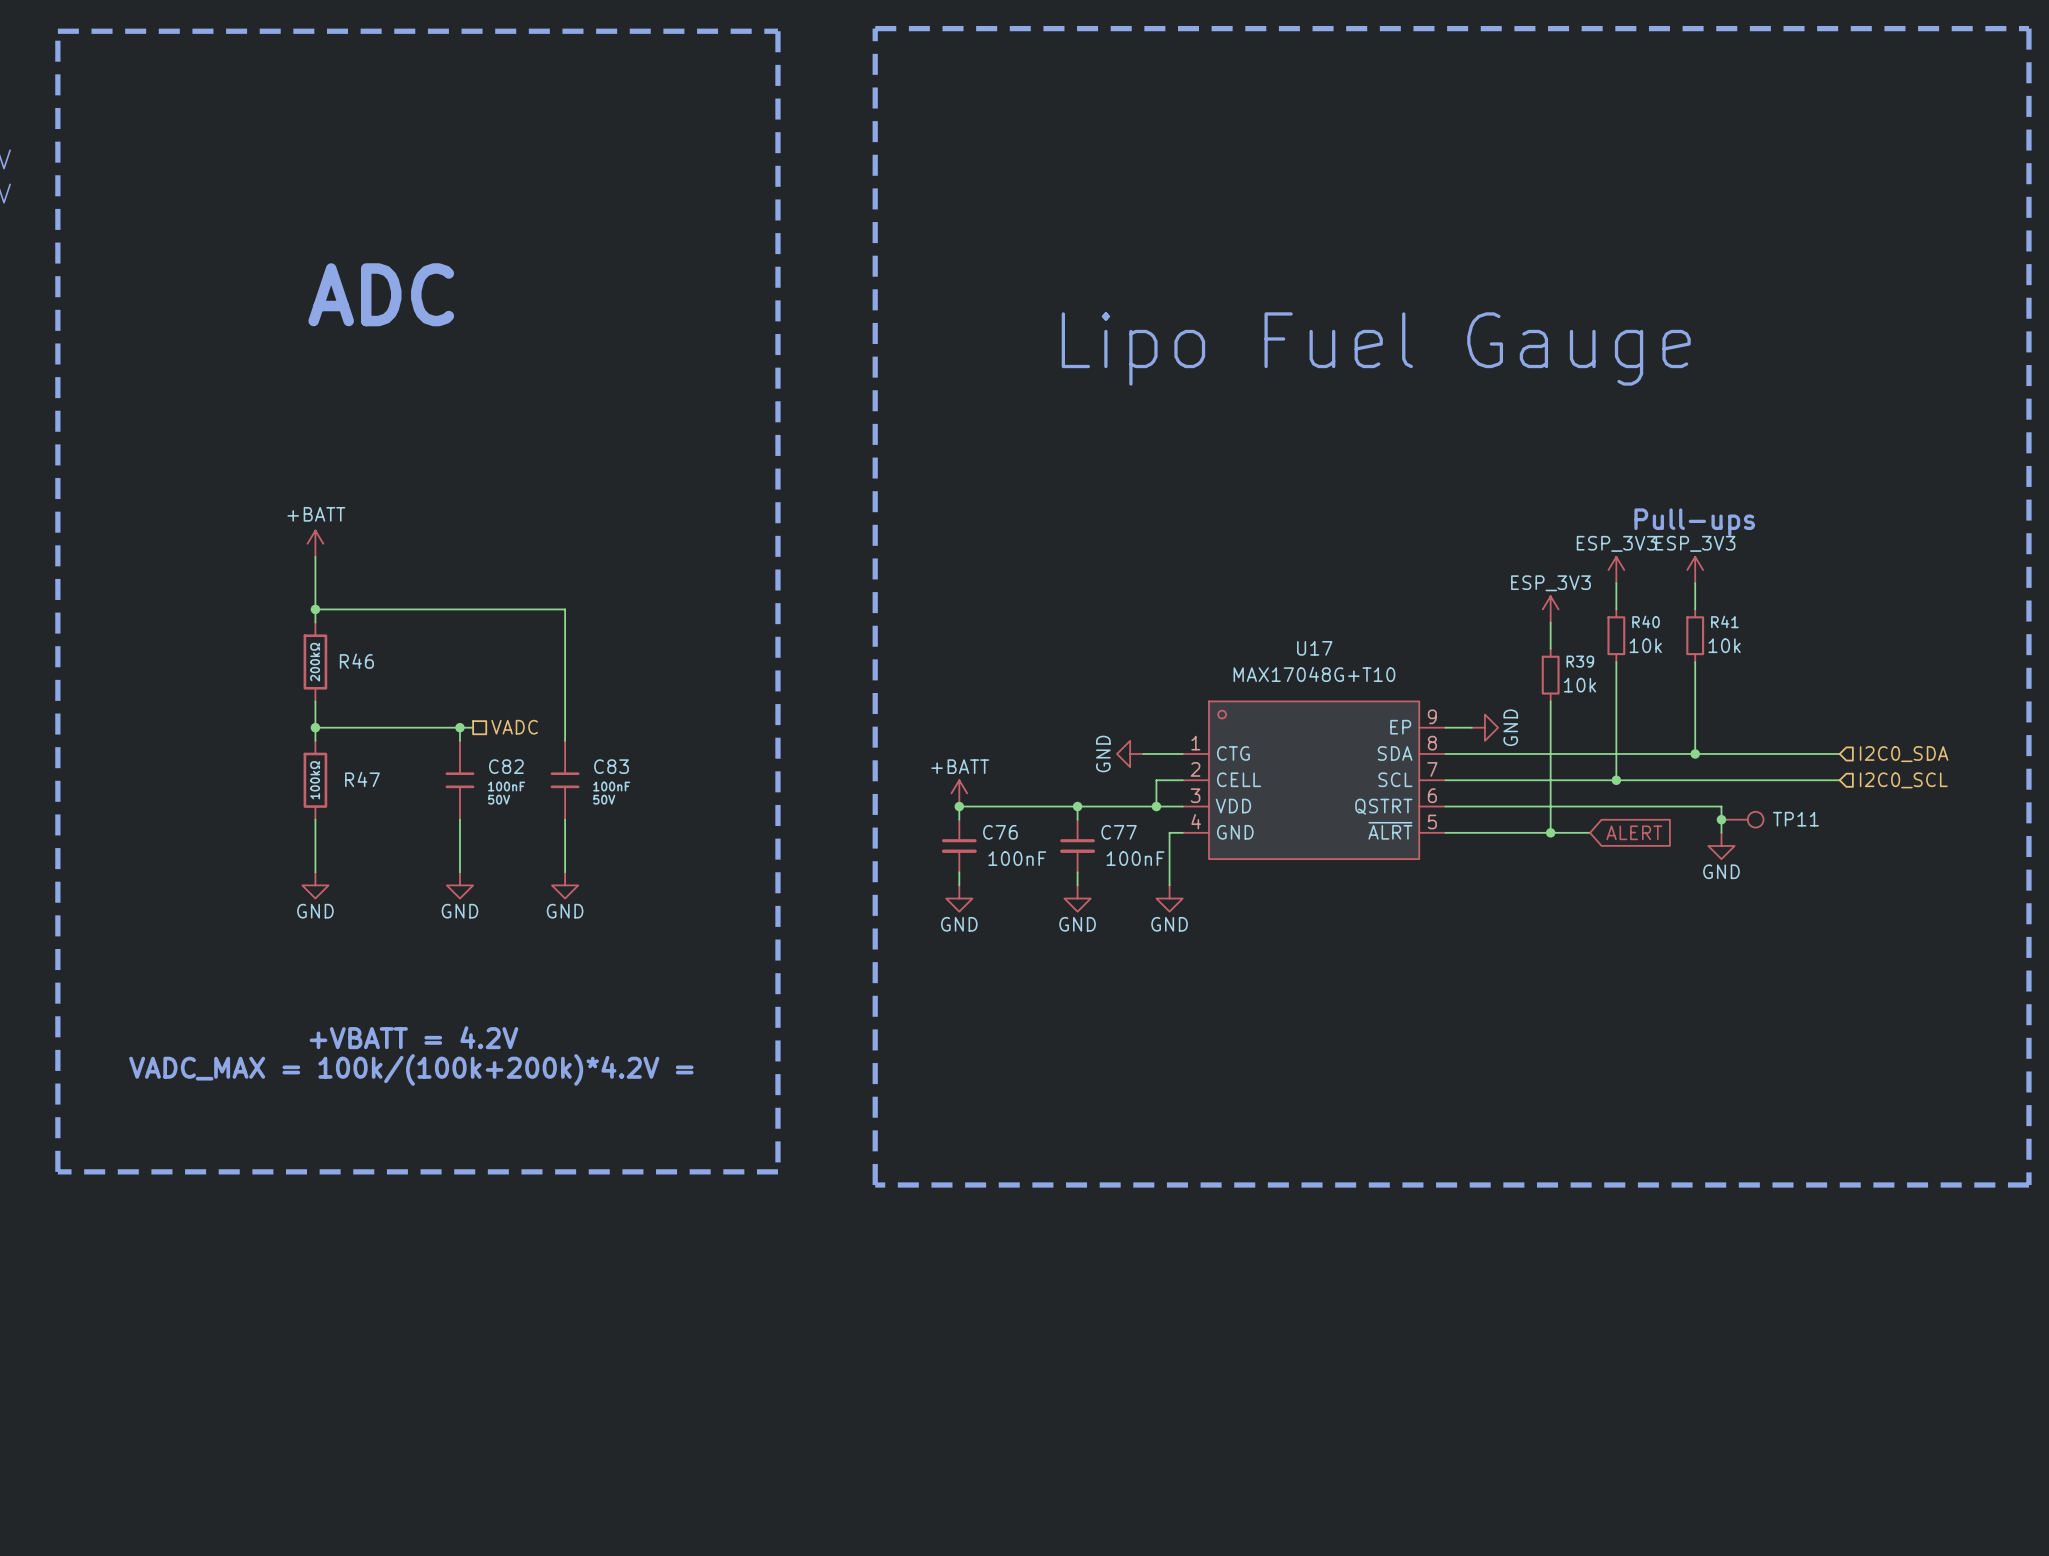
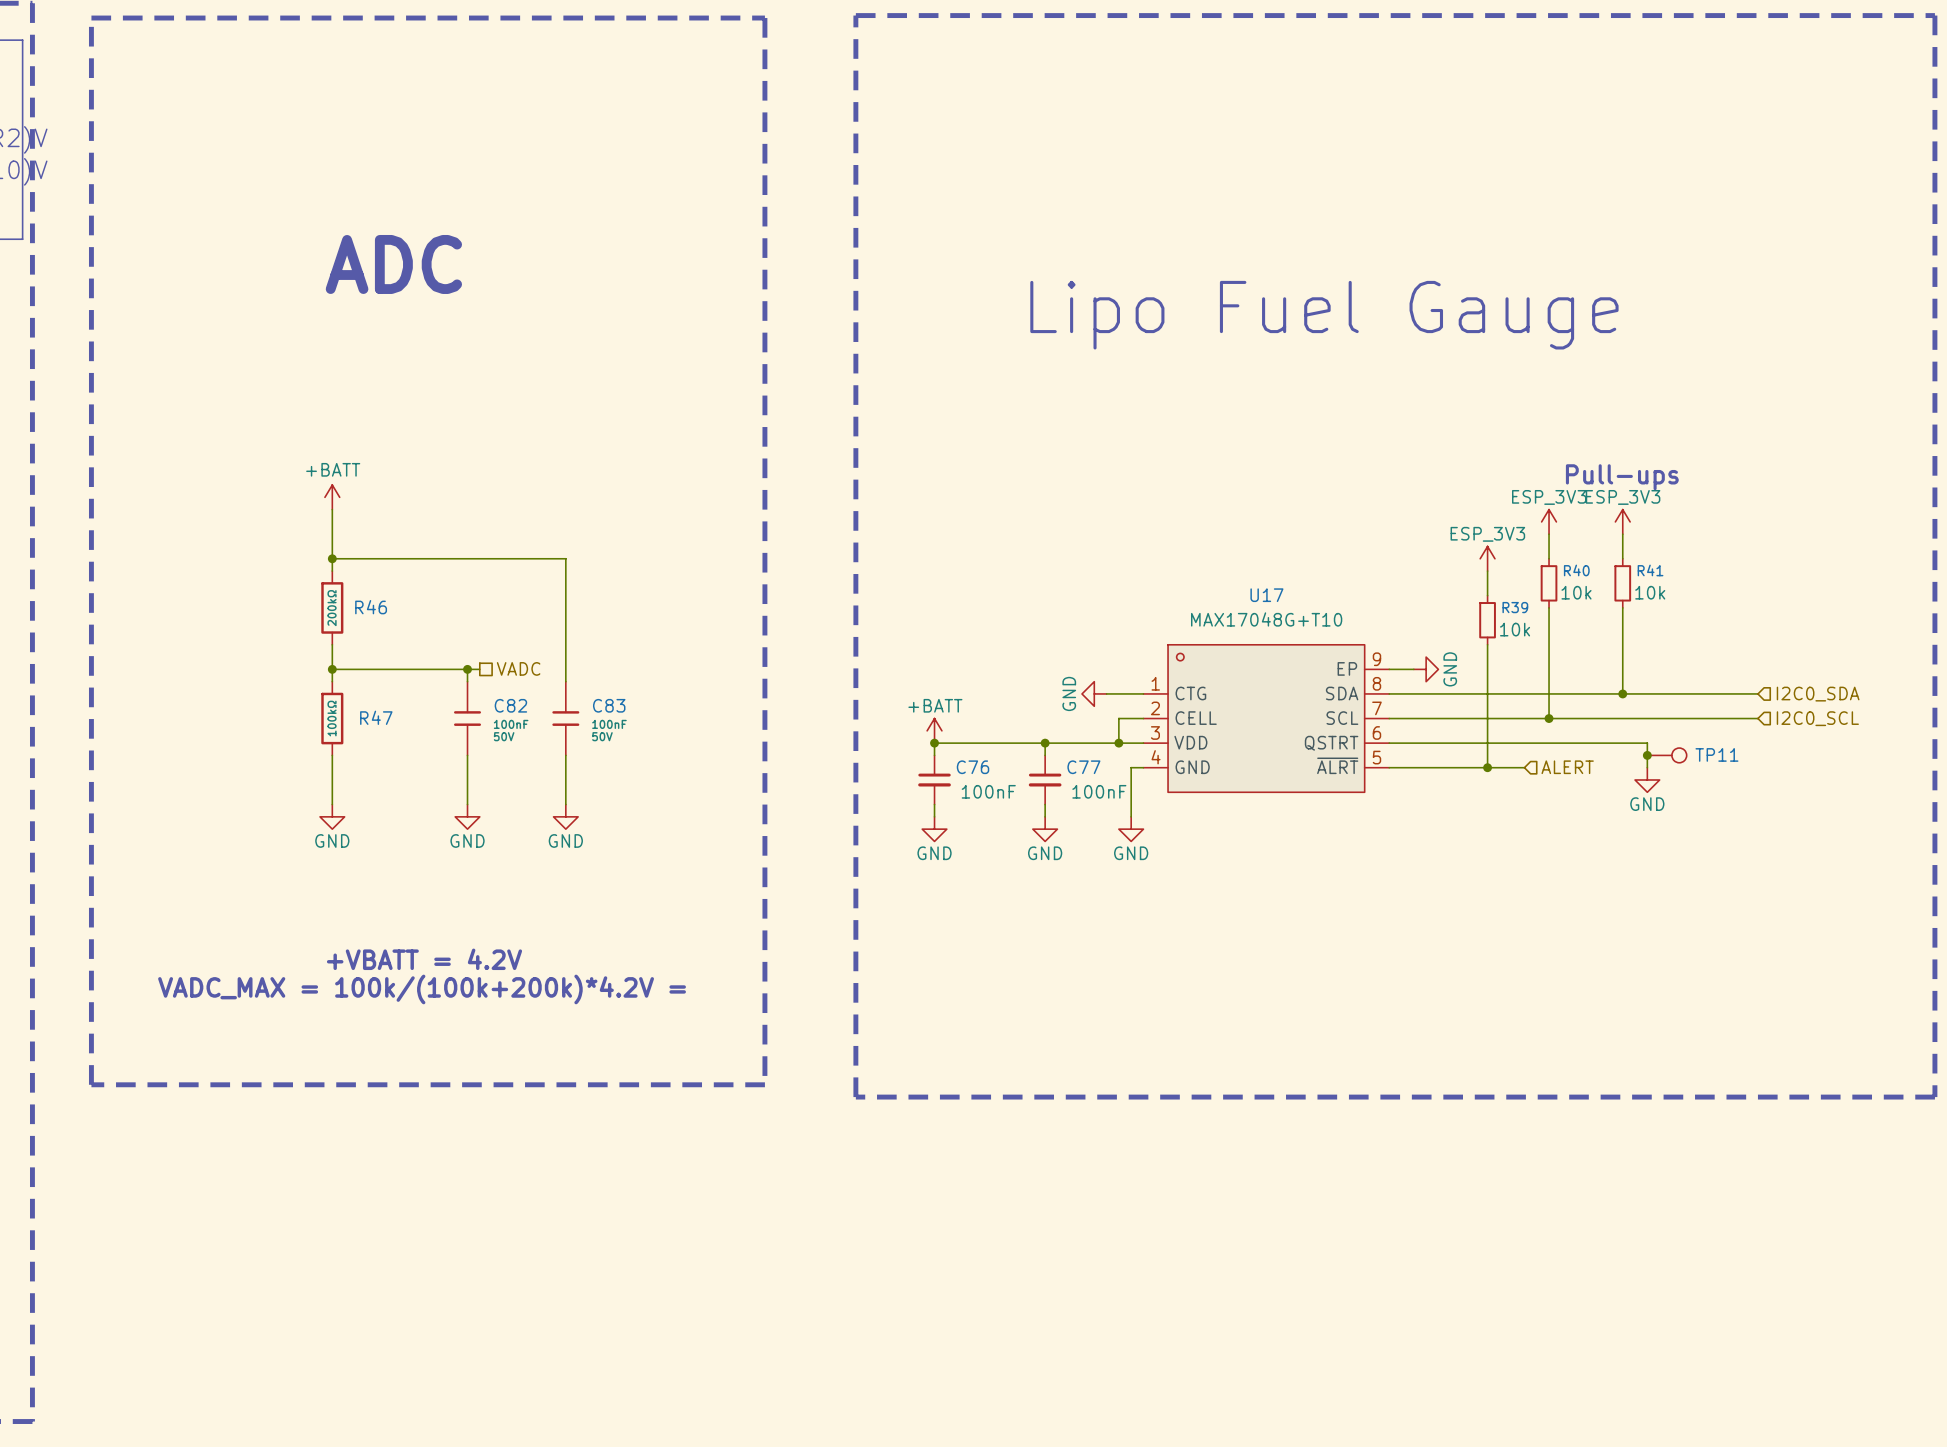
global label: ALERT (1634, 832) -> none
hierarchical label: none -> ALERT (1567, 767)

